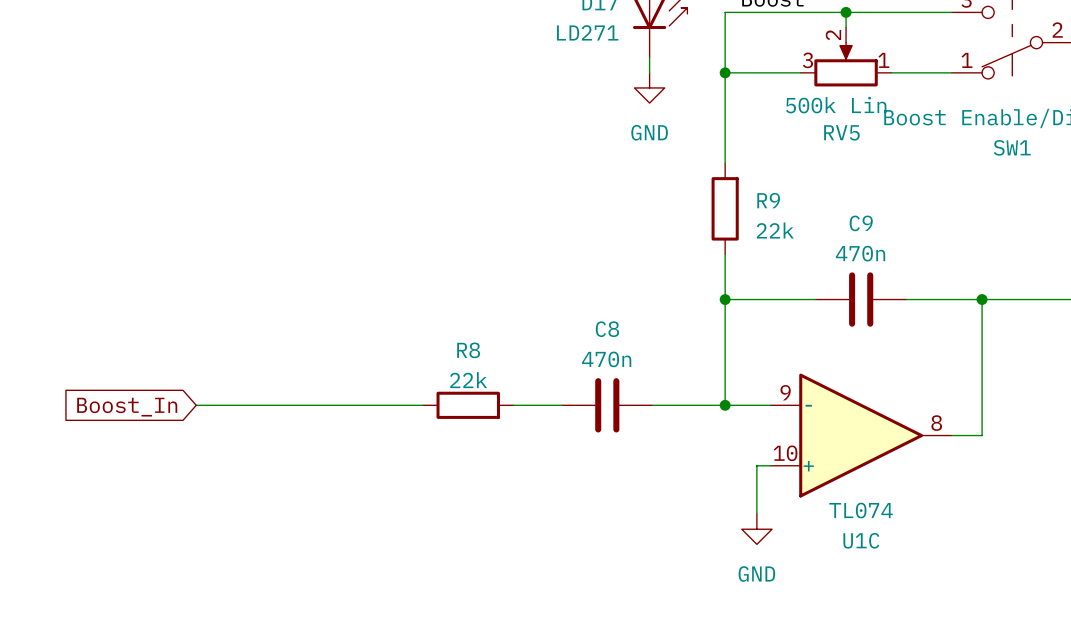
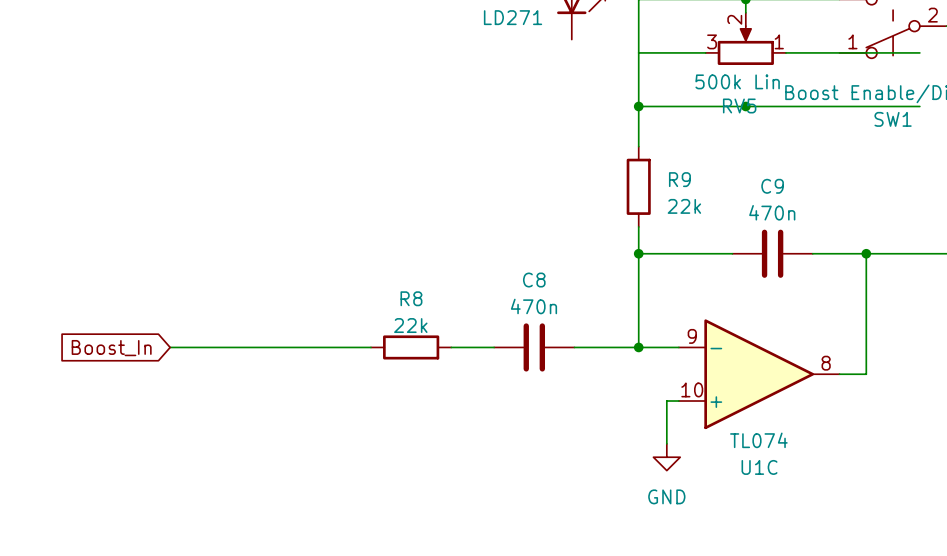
wire: (649, 57) (649, 72) -> none
junction position: (725, 72) -> (638, 106)
wire: none -> (839, 52) (919, 52)
power symbol: GND (649, 87) -> none
wire: none -> (638, 106) (919, 106)
junction: none -> (745, 106)
R9 position: (725, 208) -> (638, 186)
C9 position: (861, 299) -> (772, 253)

